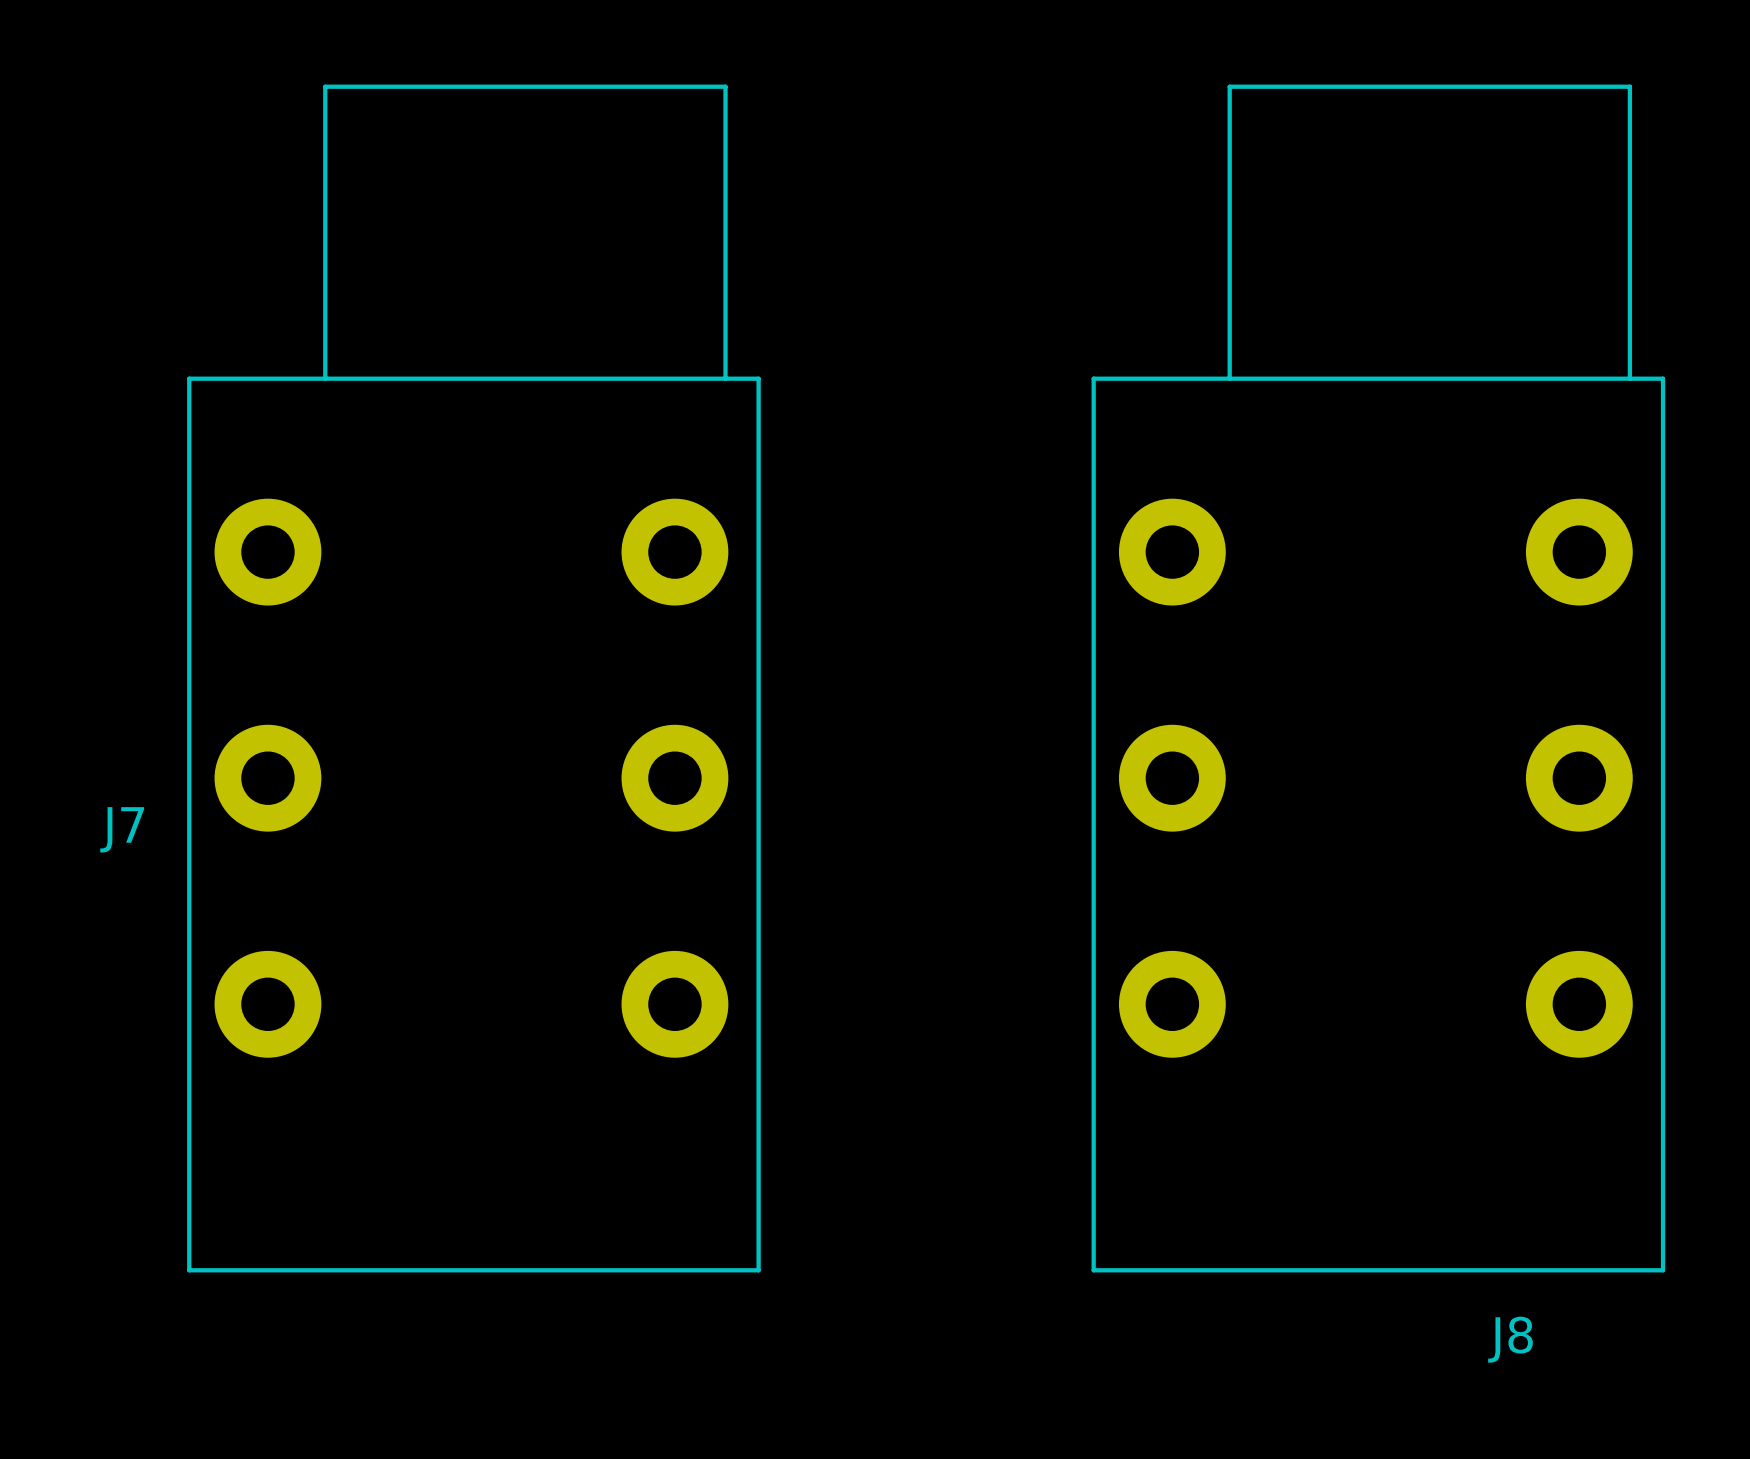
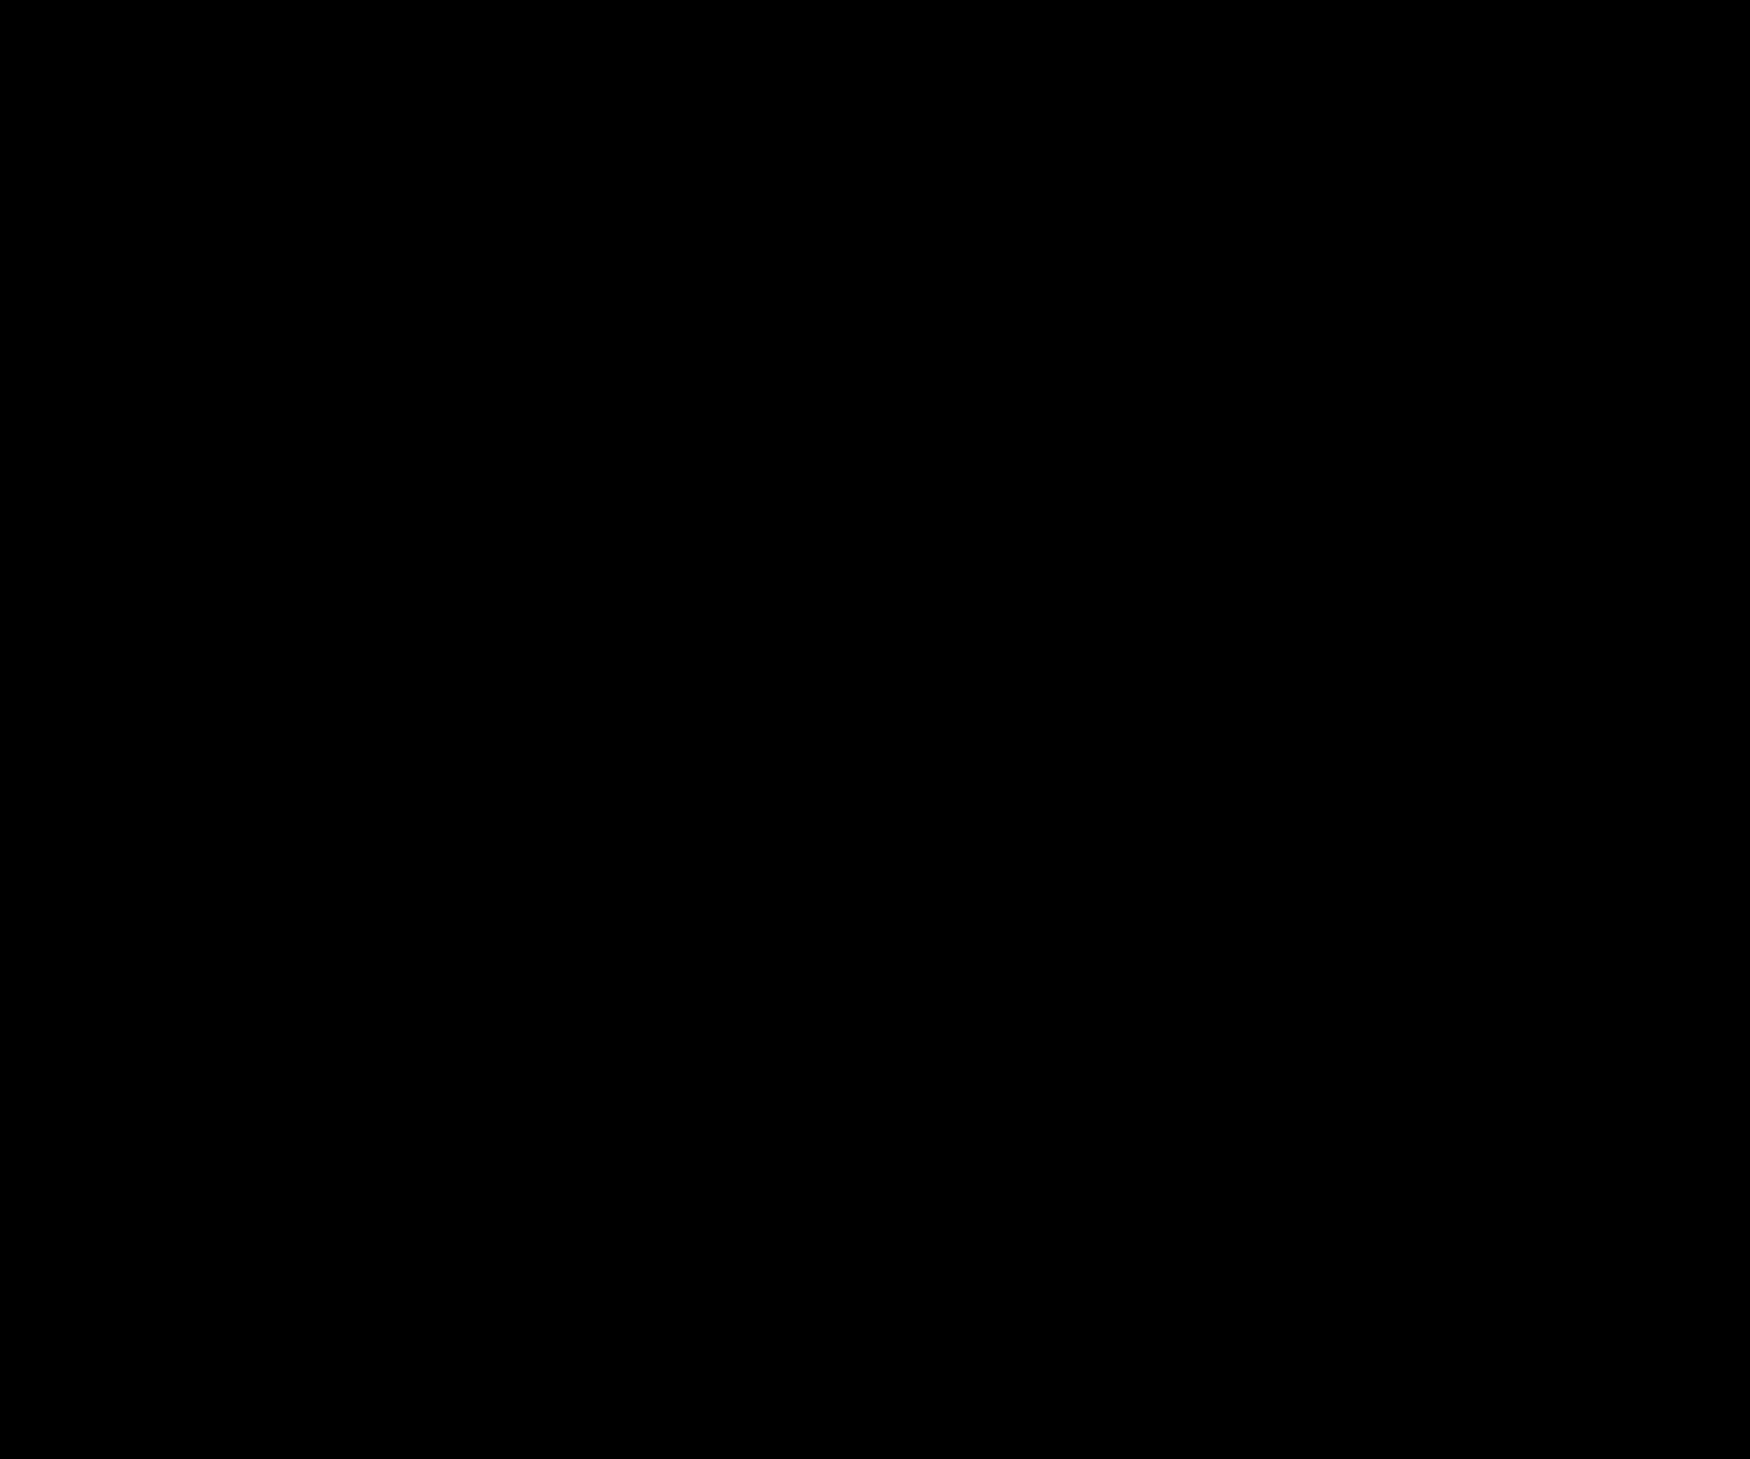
J7: (473, 678) -> none
J8: (1378, 678) -> none

